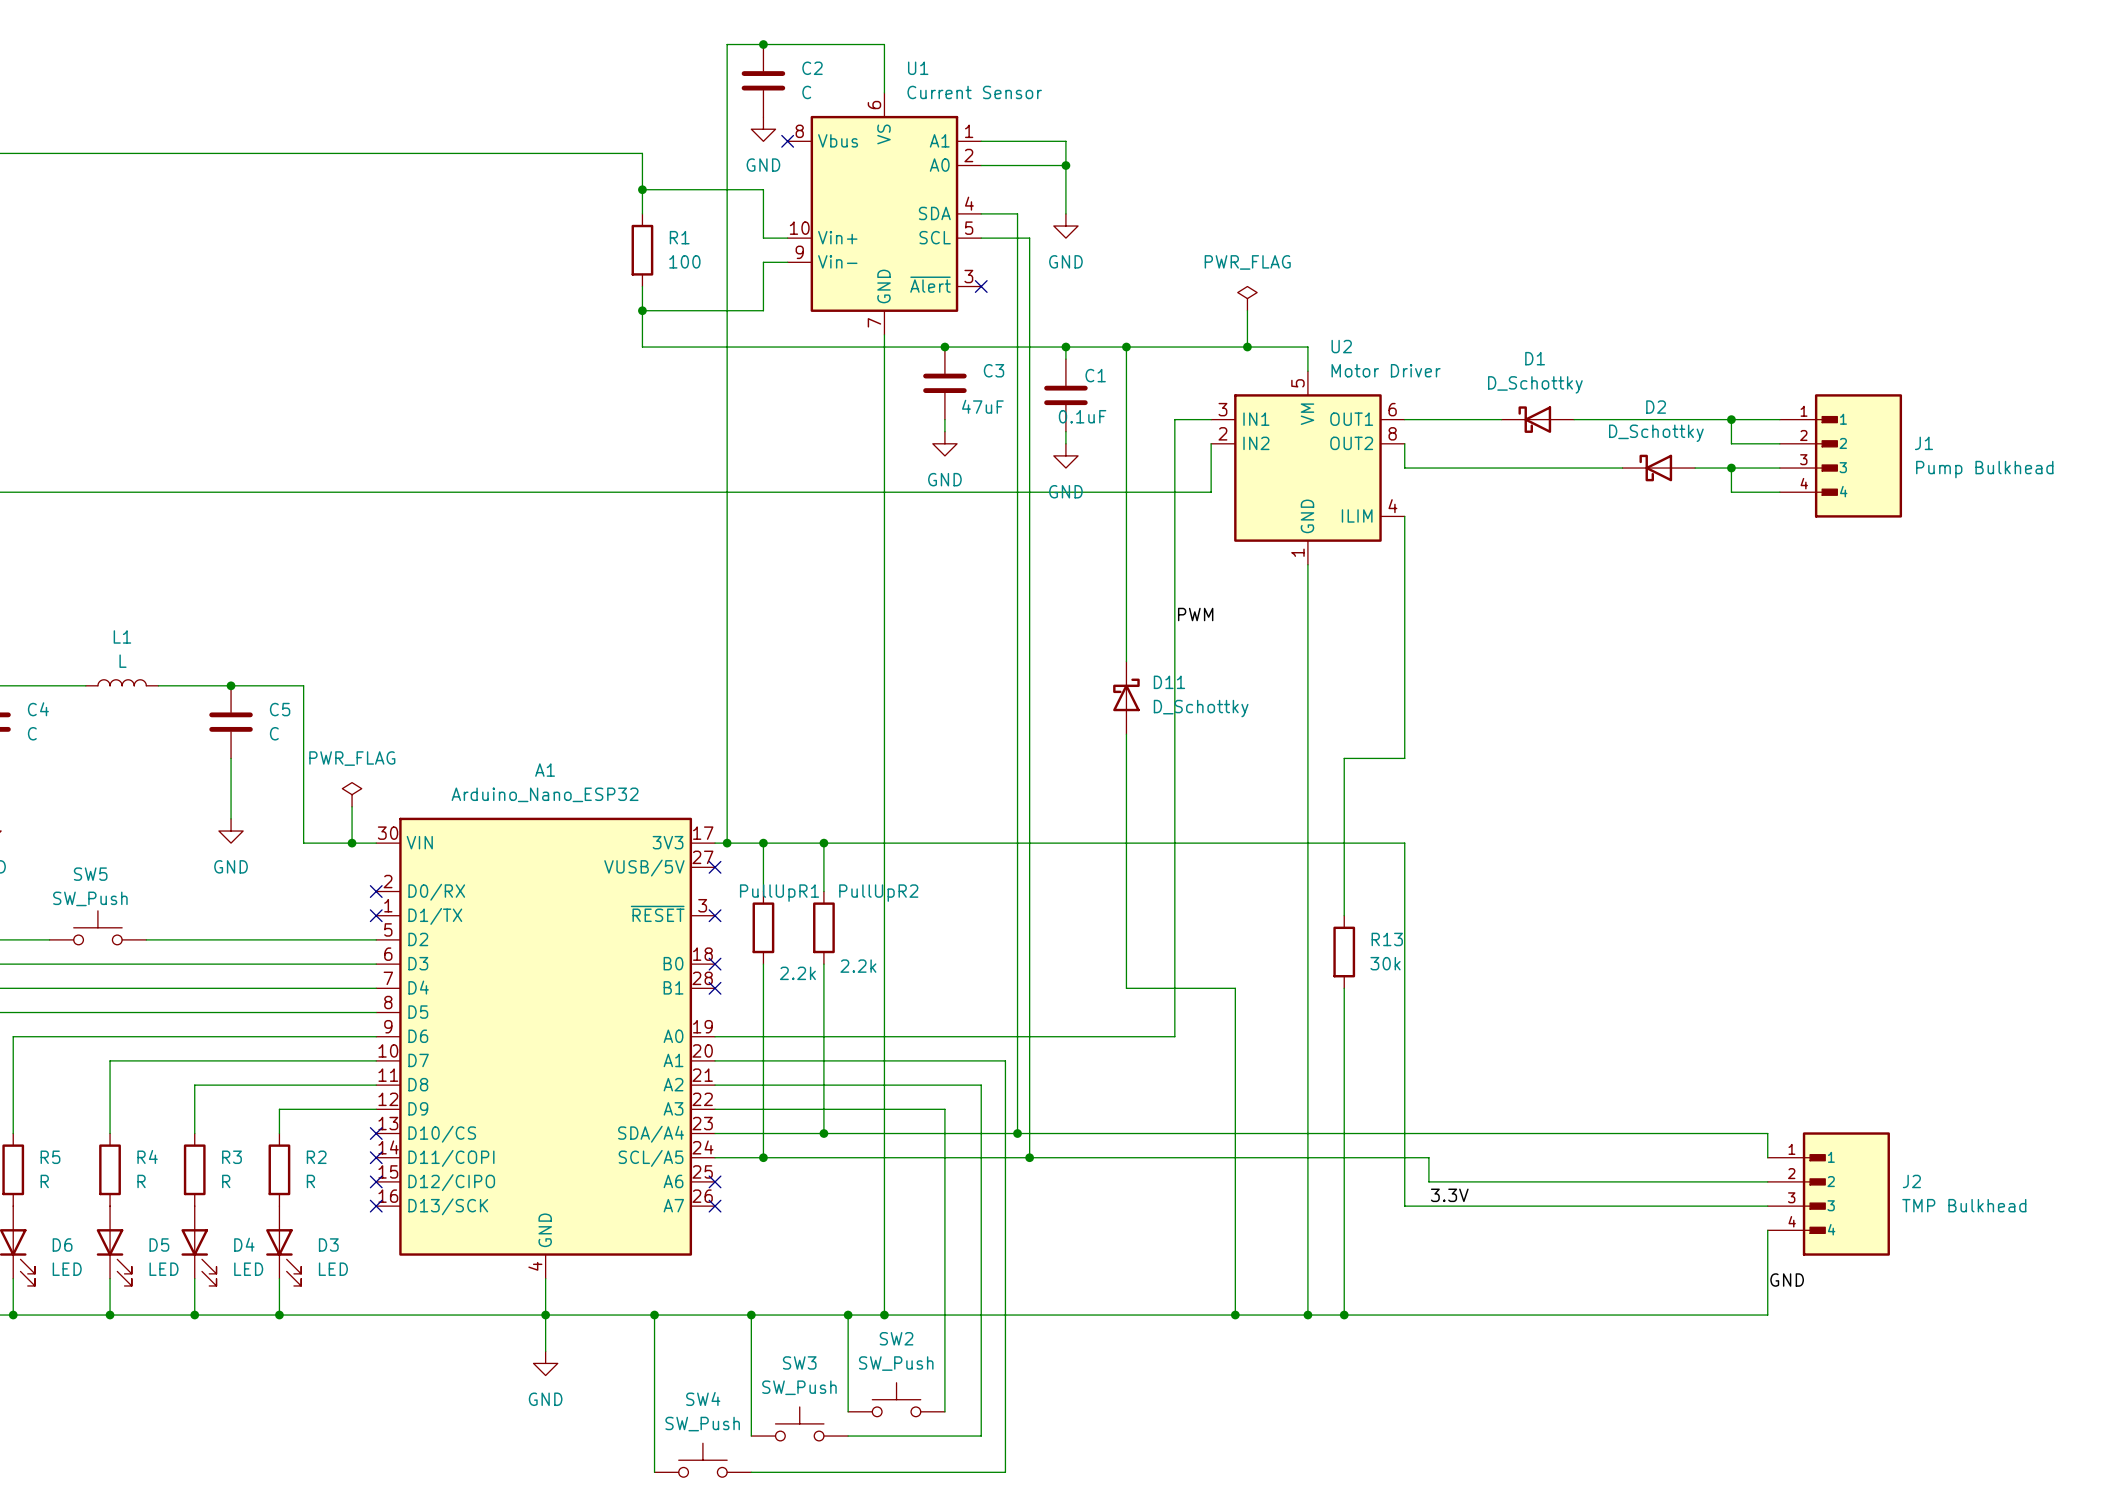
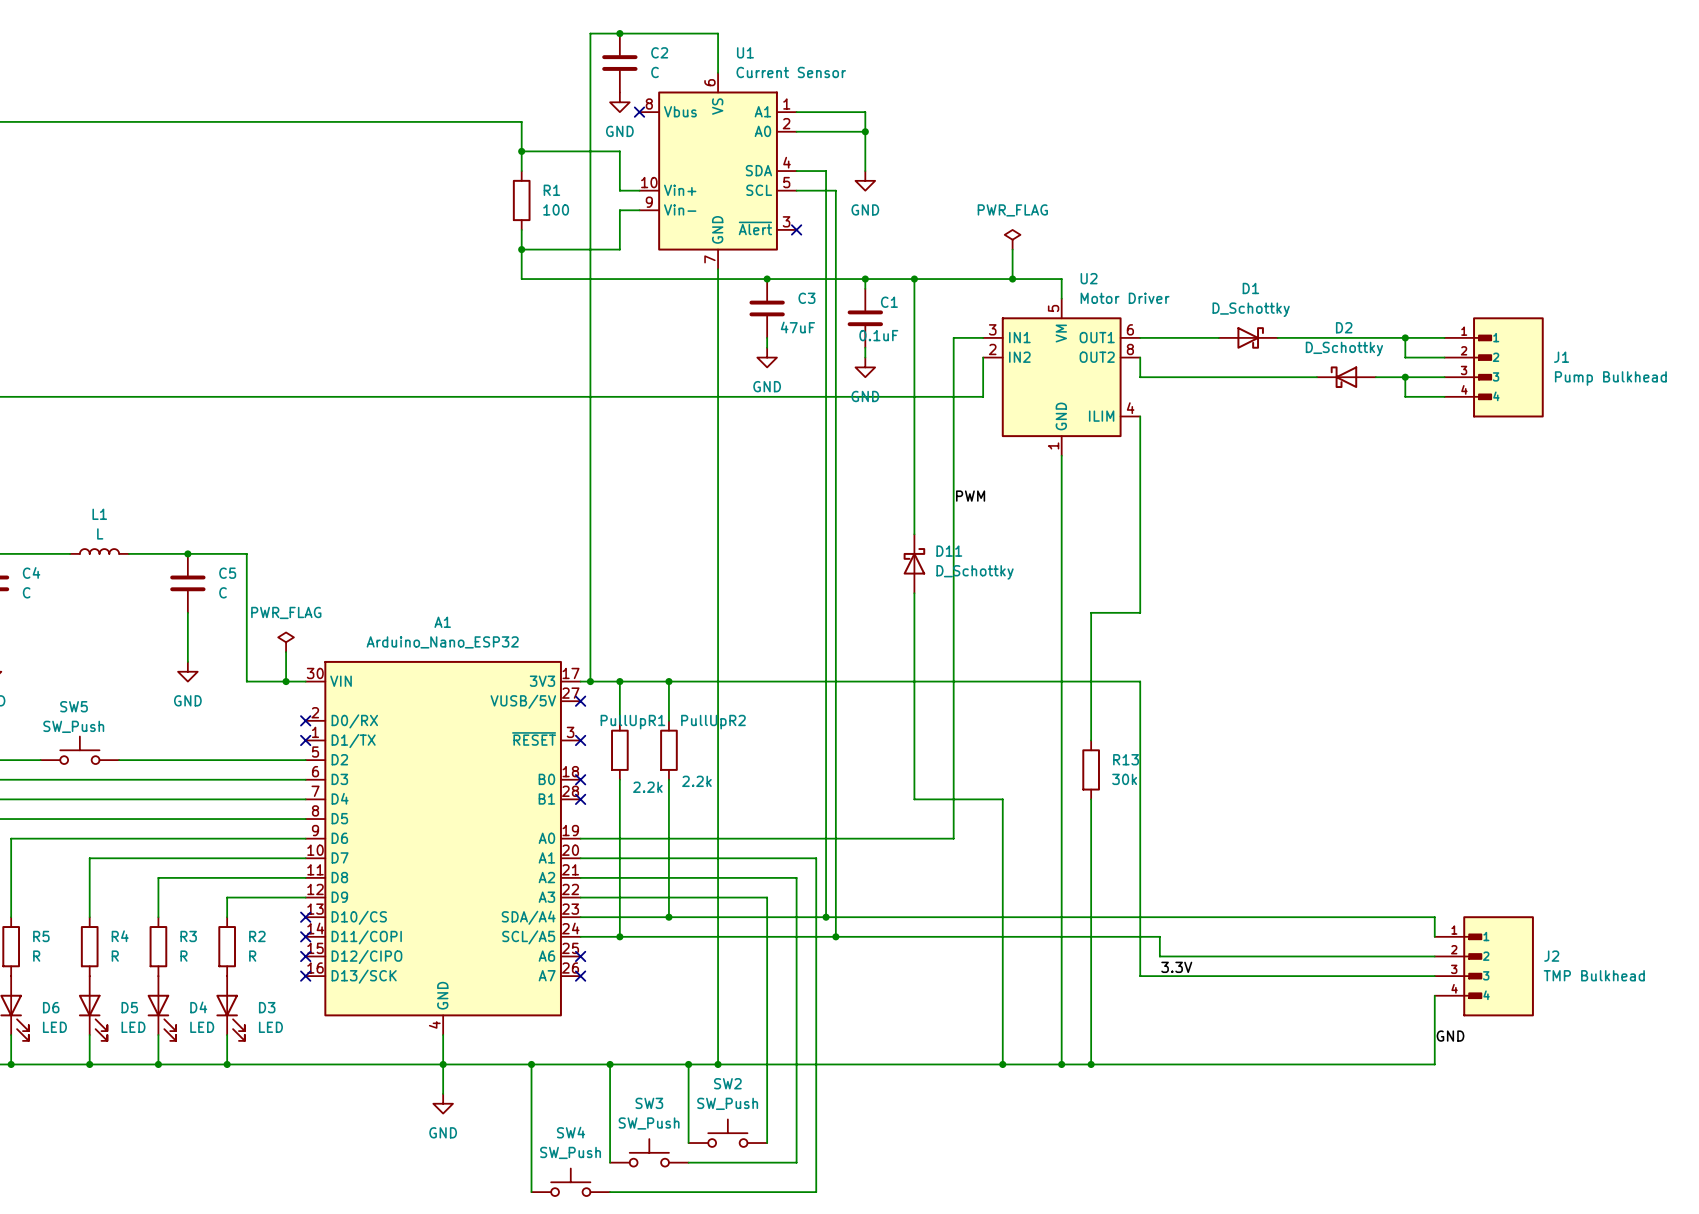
D1 flip: as is (1534, 419) -> left-right (1250, 337)

